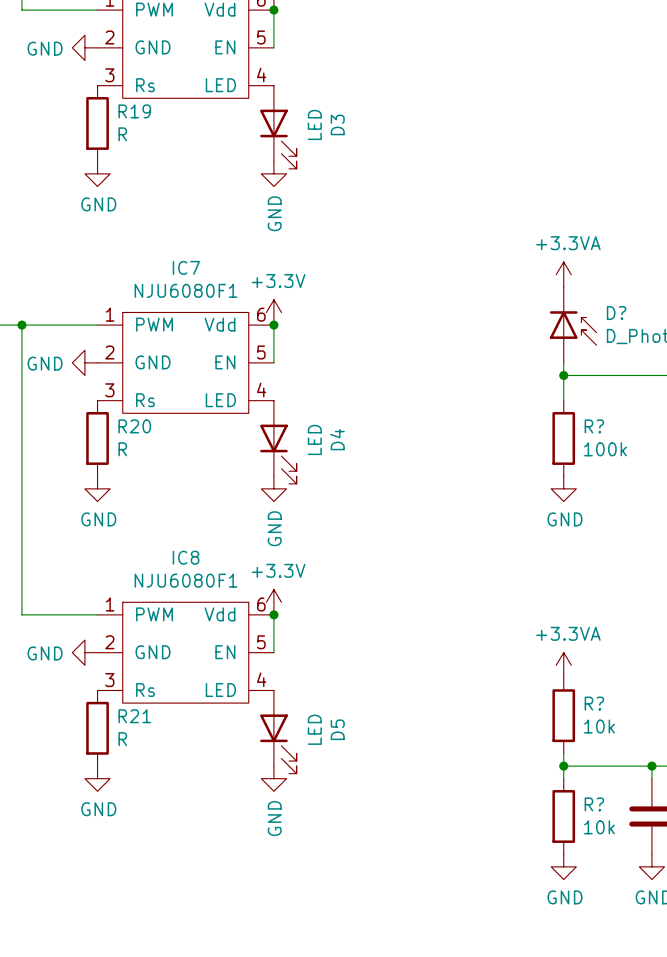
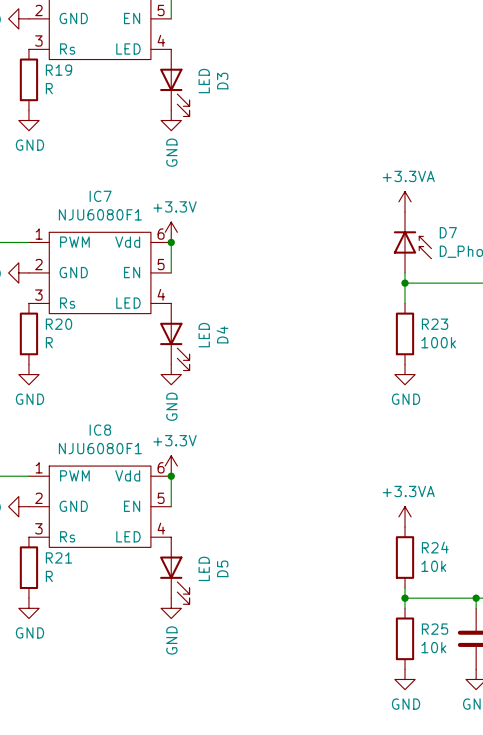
D? name: D? (616, 313) -> D7 (448, 232)
R? name: R? (594, 426) -> R23 (435, 324)
R? name: R? (594, 703) -> R24 (435, 547)
R? name: R? (594, 804) -> R25 (435, 629)

